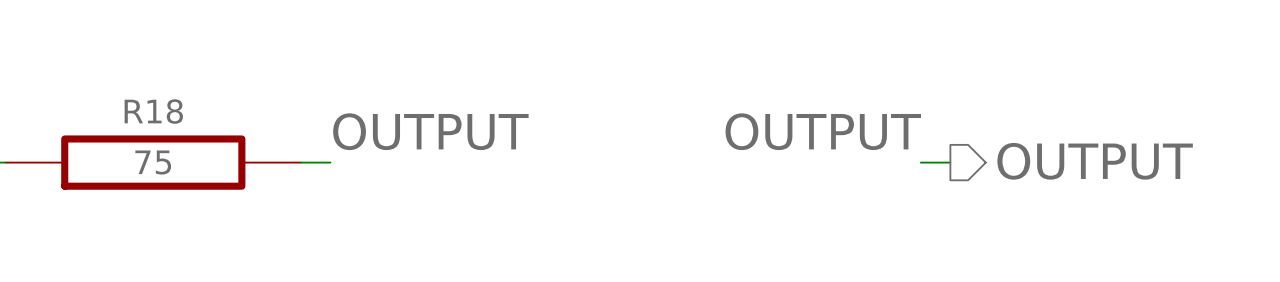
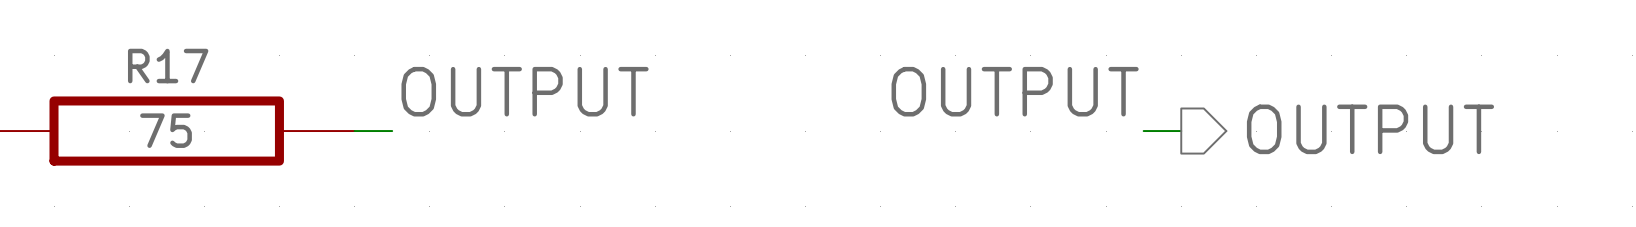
R18 name: R18 (153, 111) -> R17 (168, 66)

